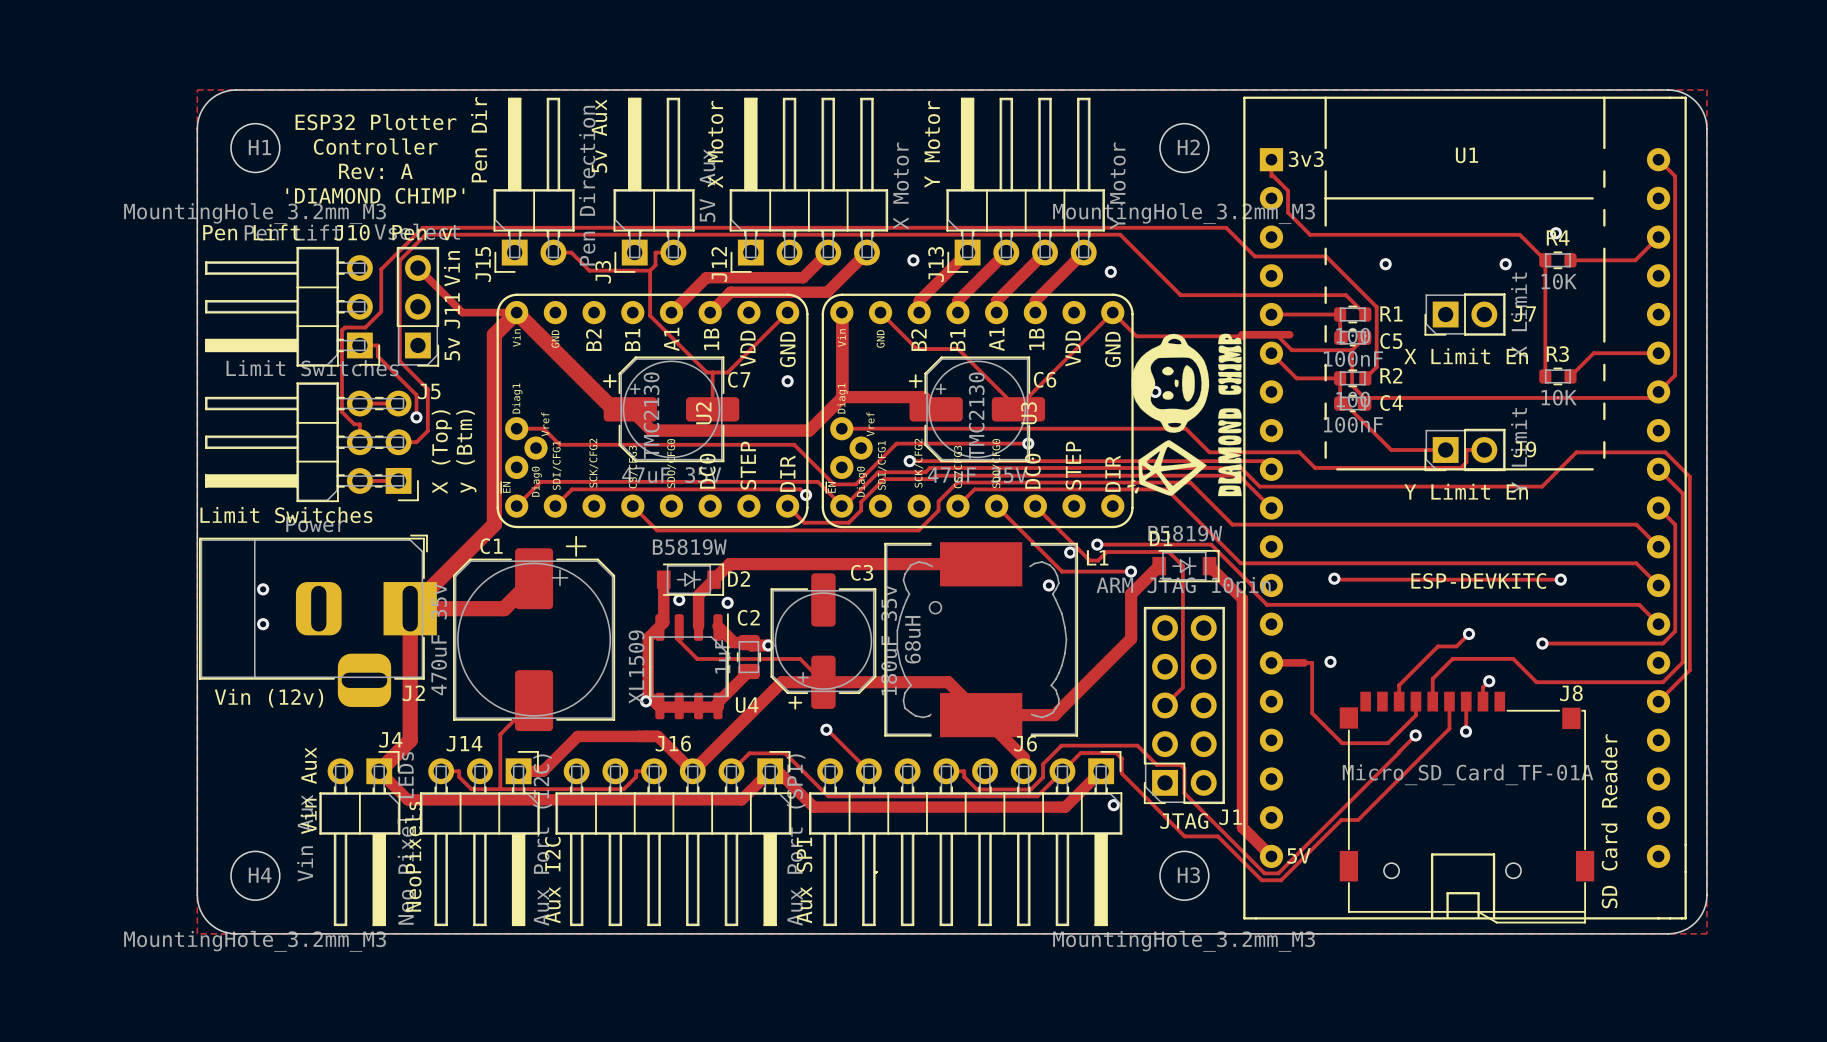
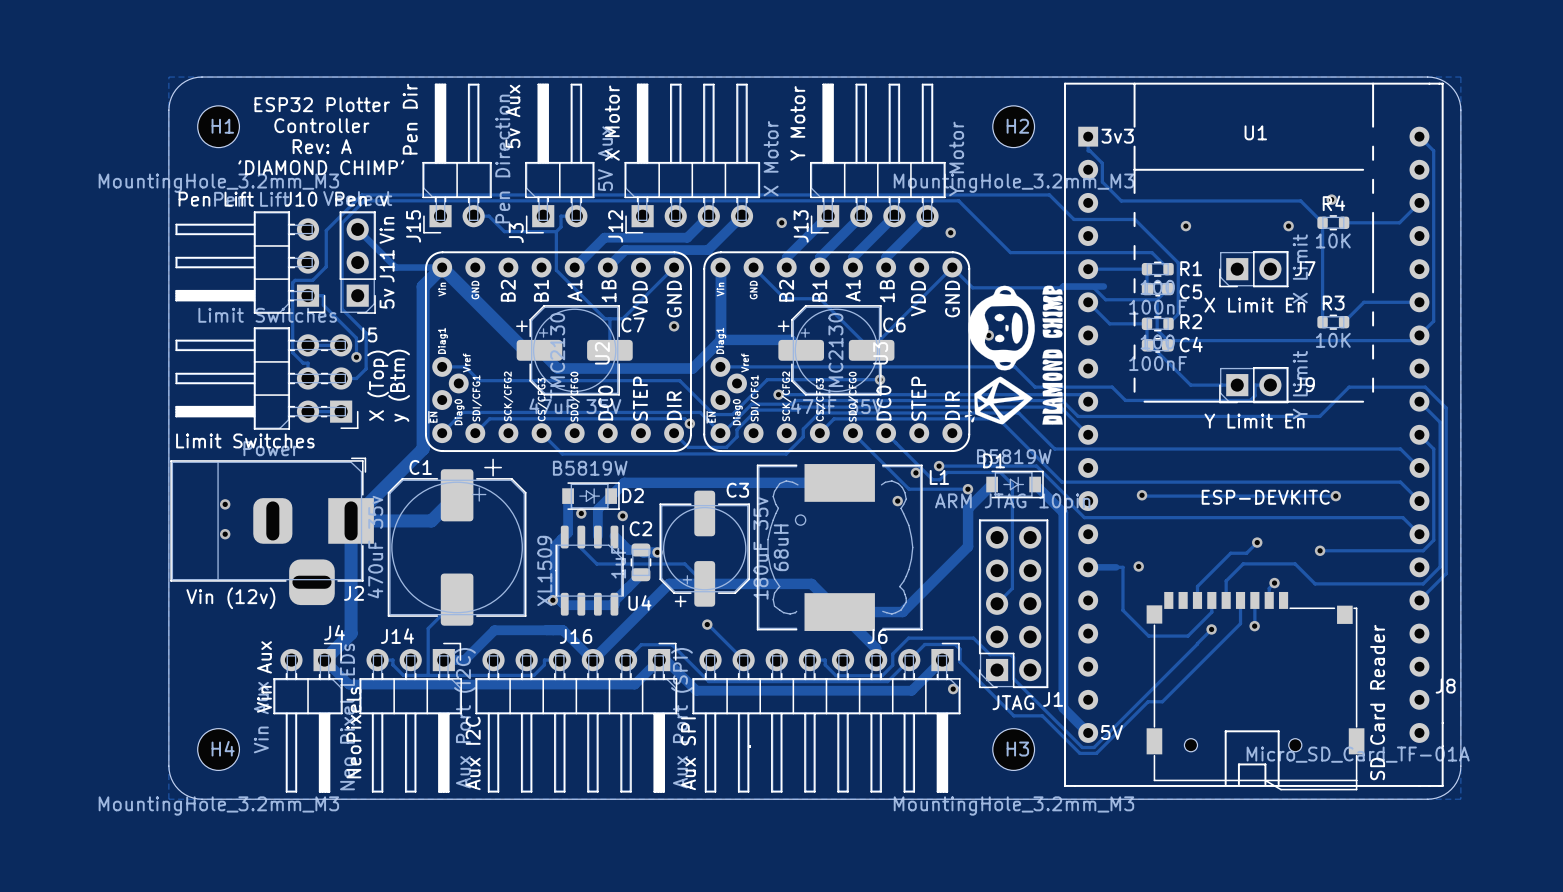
J8 name position: J8 (1571, 693) -> J8 (1445, 686)
J8 value position: Micro_SD_Card_TF-01A (1468, 774) -> Micro_SD_Card_TF-01A (1358, 754)

